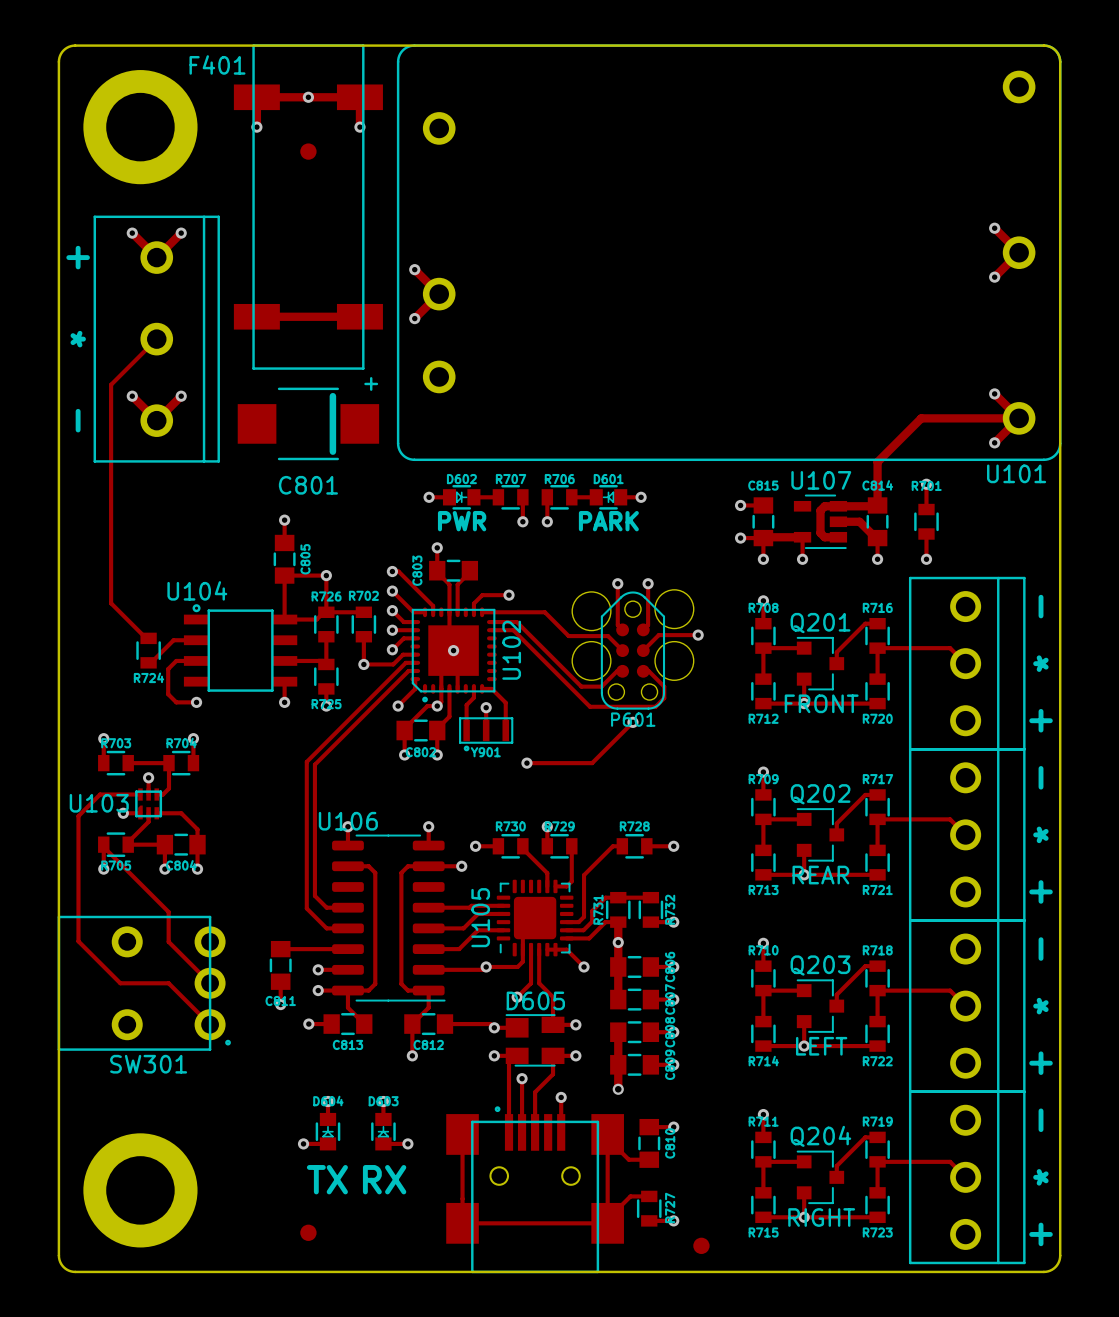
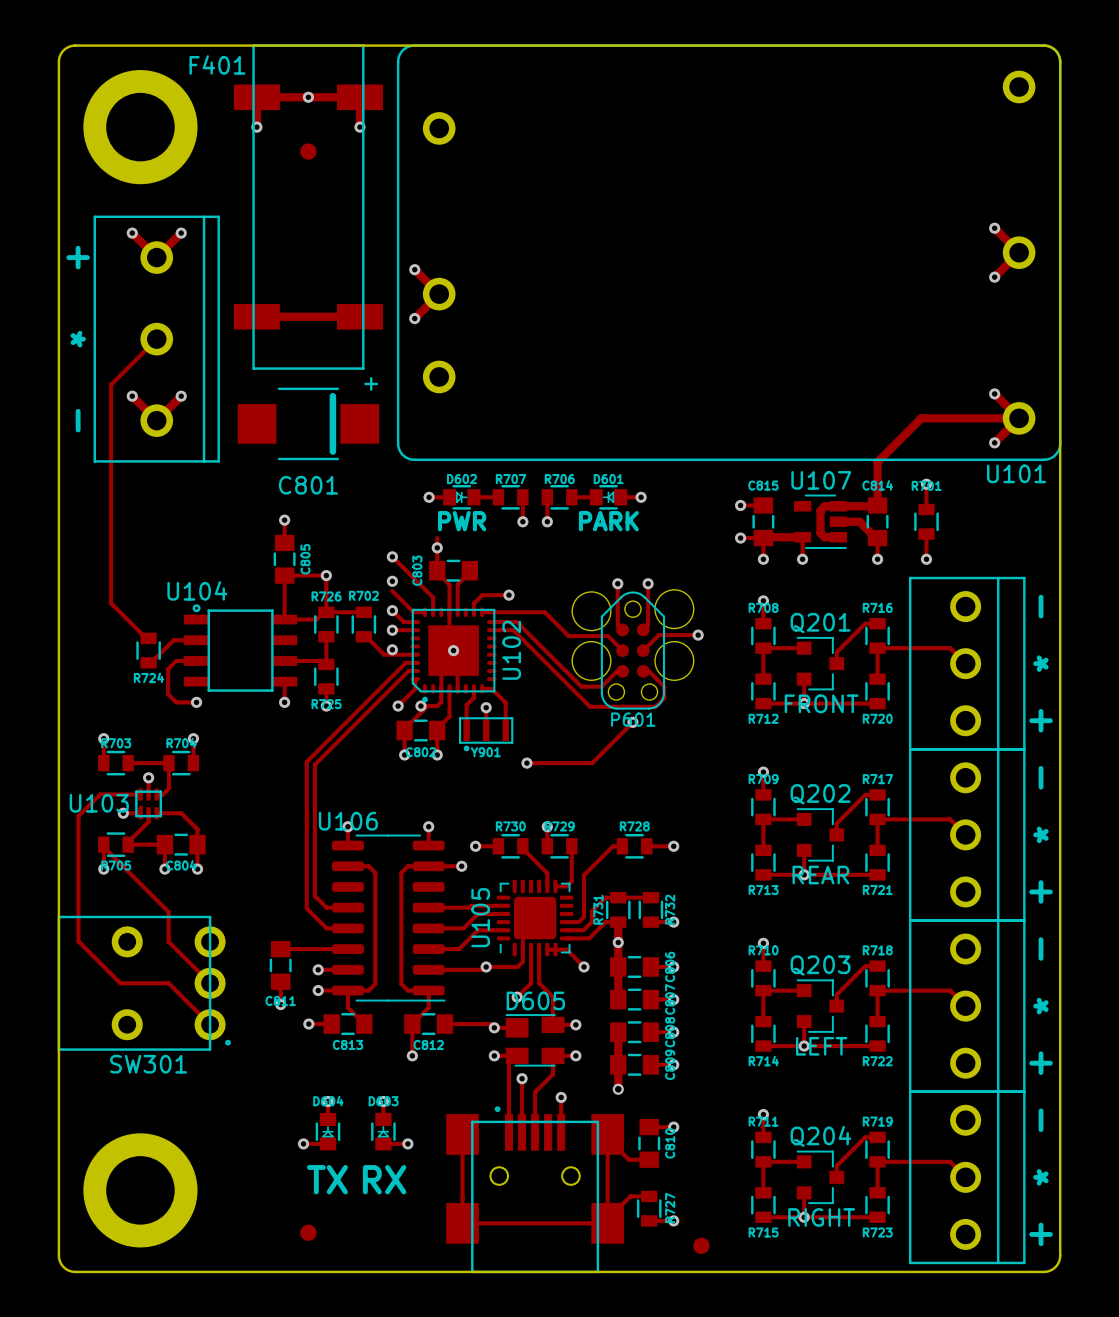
track: none -> (437, 538) (437, 547)
via: none -> (392, 556)
track: (392, 571) (398, 571) (433, 606) -> (392, 556) (433, 597) (433, 606)
via: (392, 571) -> none
via: none -> (392, 581)
via: (392, 591) -> none
track: (363, 636) (363, 664) (393, 664) (403, 654) -> (363, 636) (366, 636) (384, 654) (403, 654)
track: (415, 638) (403, 638) (392, 649) -> none
via: (363, 664) -> none
via position: (437, 706) -> (420, 706)

